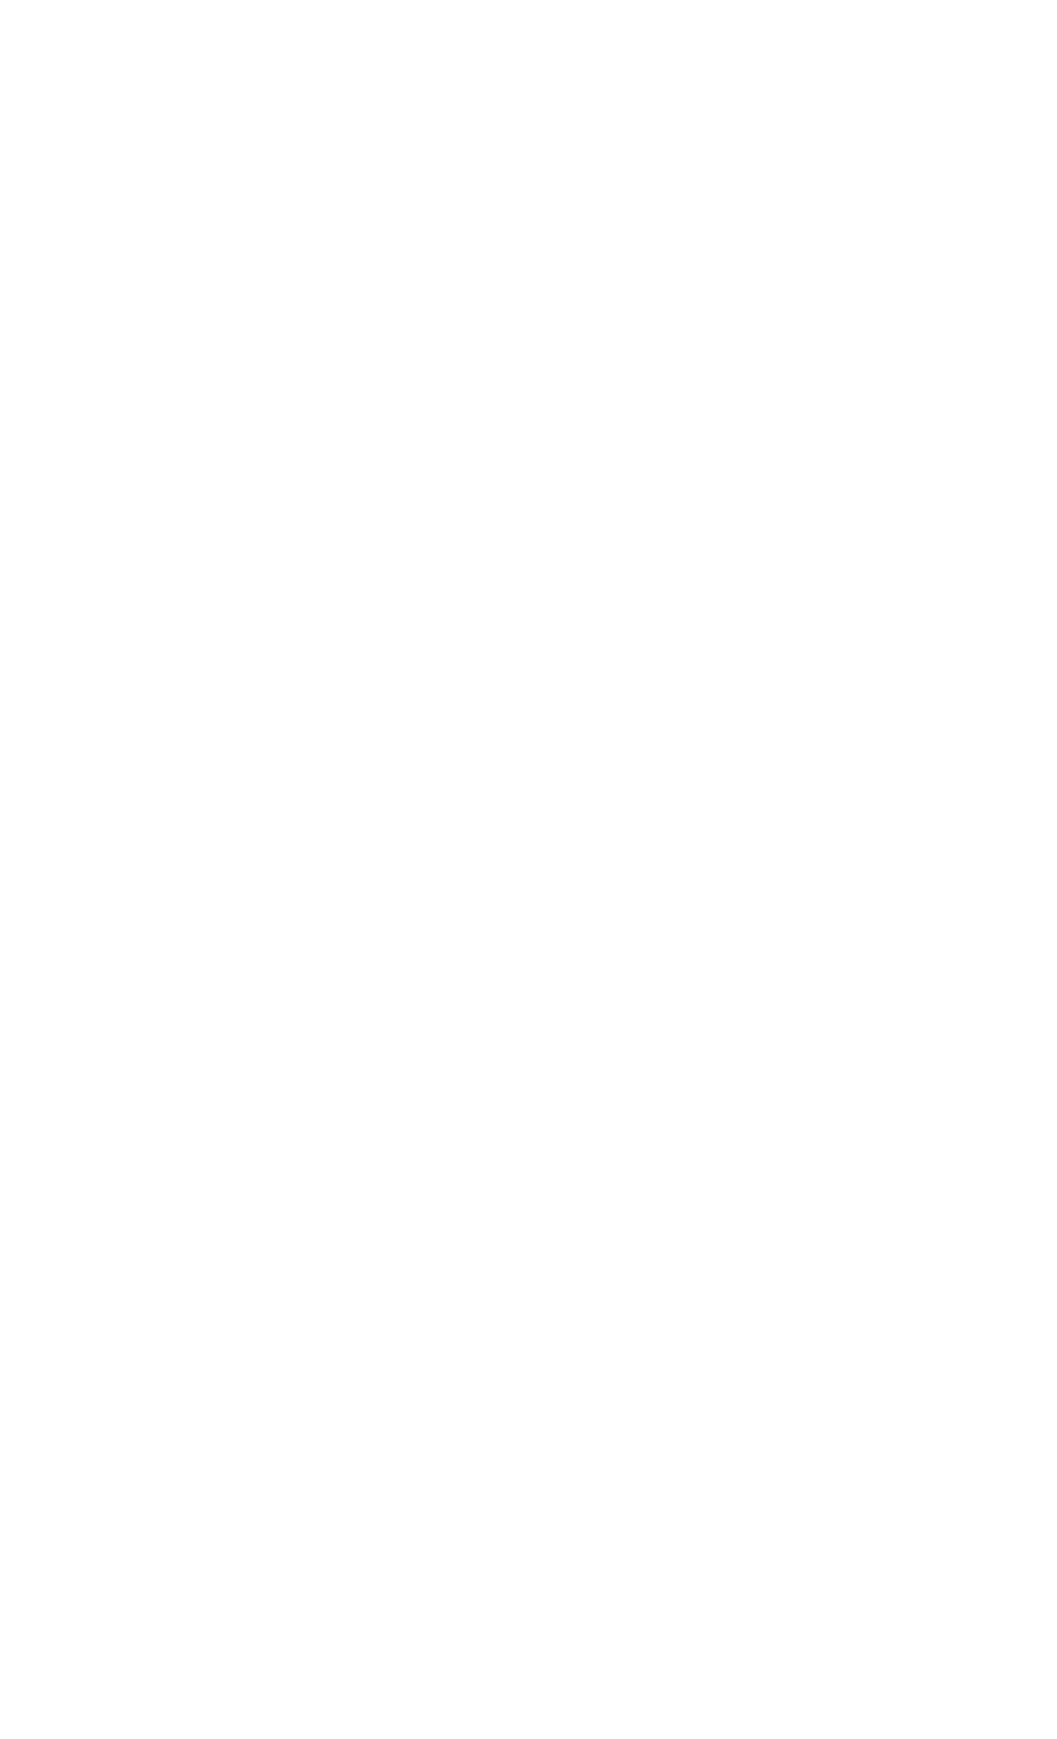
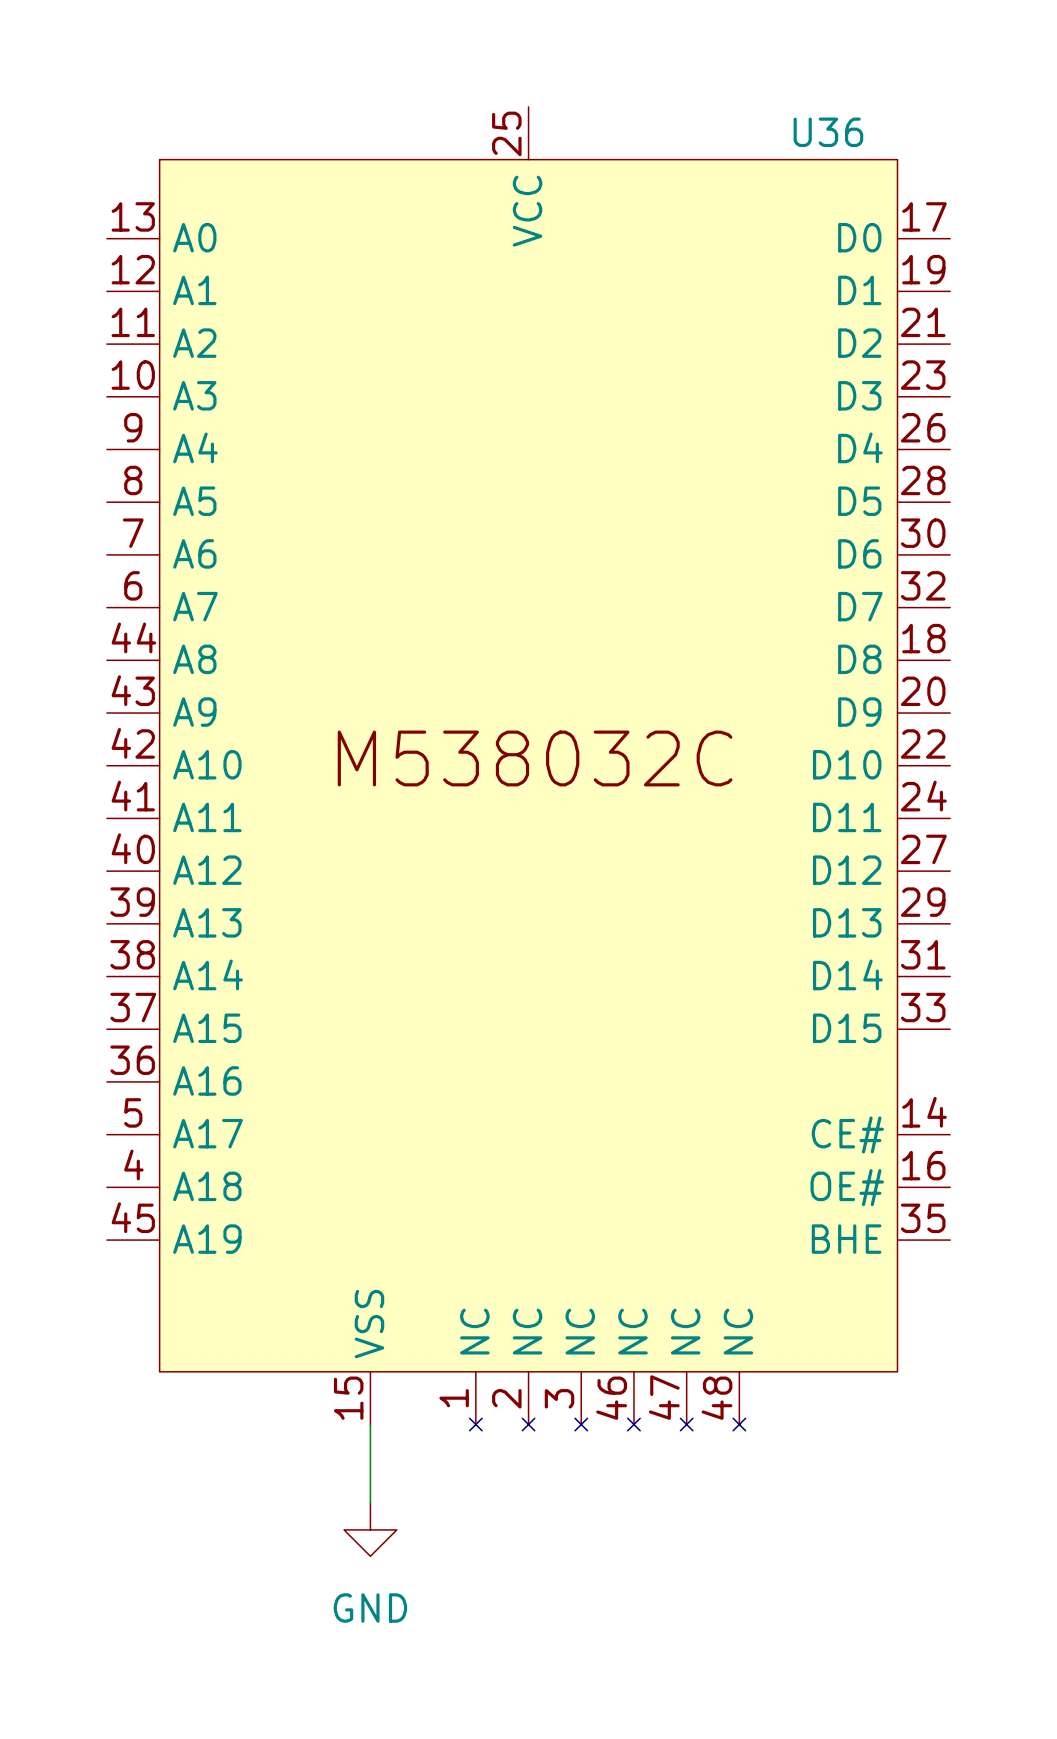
U36: none -> (528, 768)
wire: none -> (370, 1424) (370, 1503)
power symbol: none -> GND (370, 1529)

